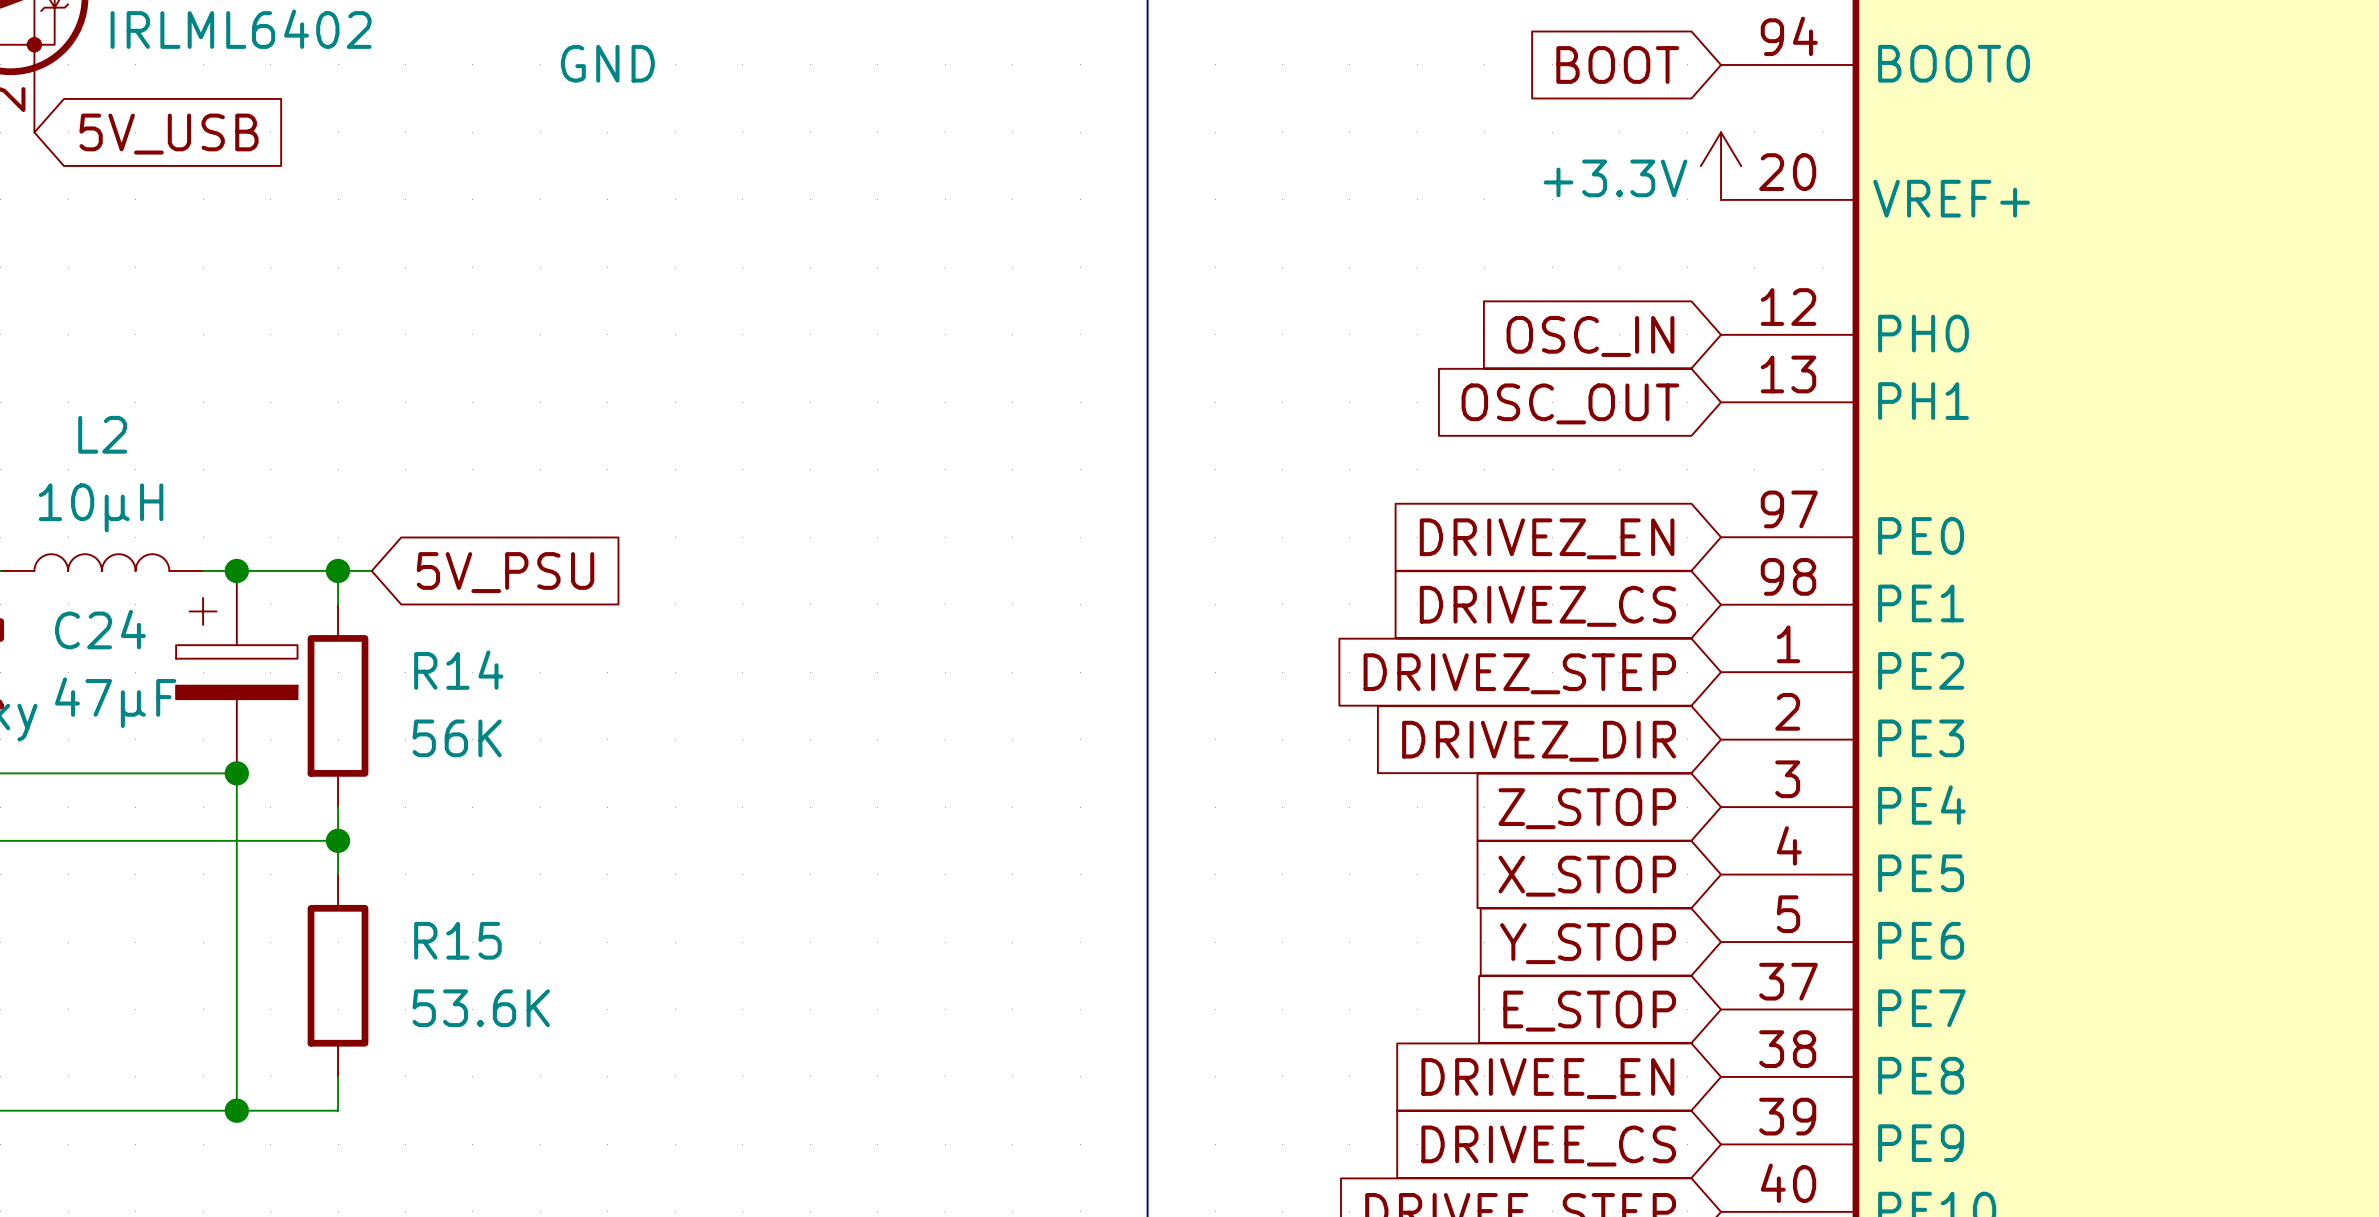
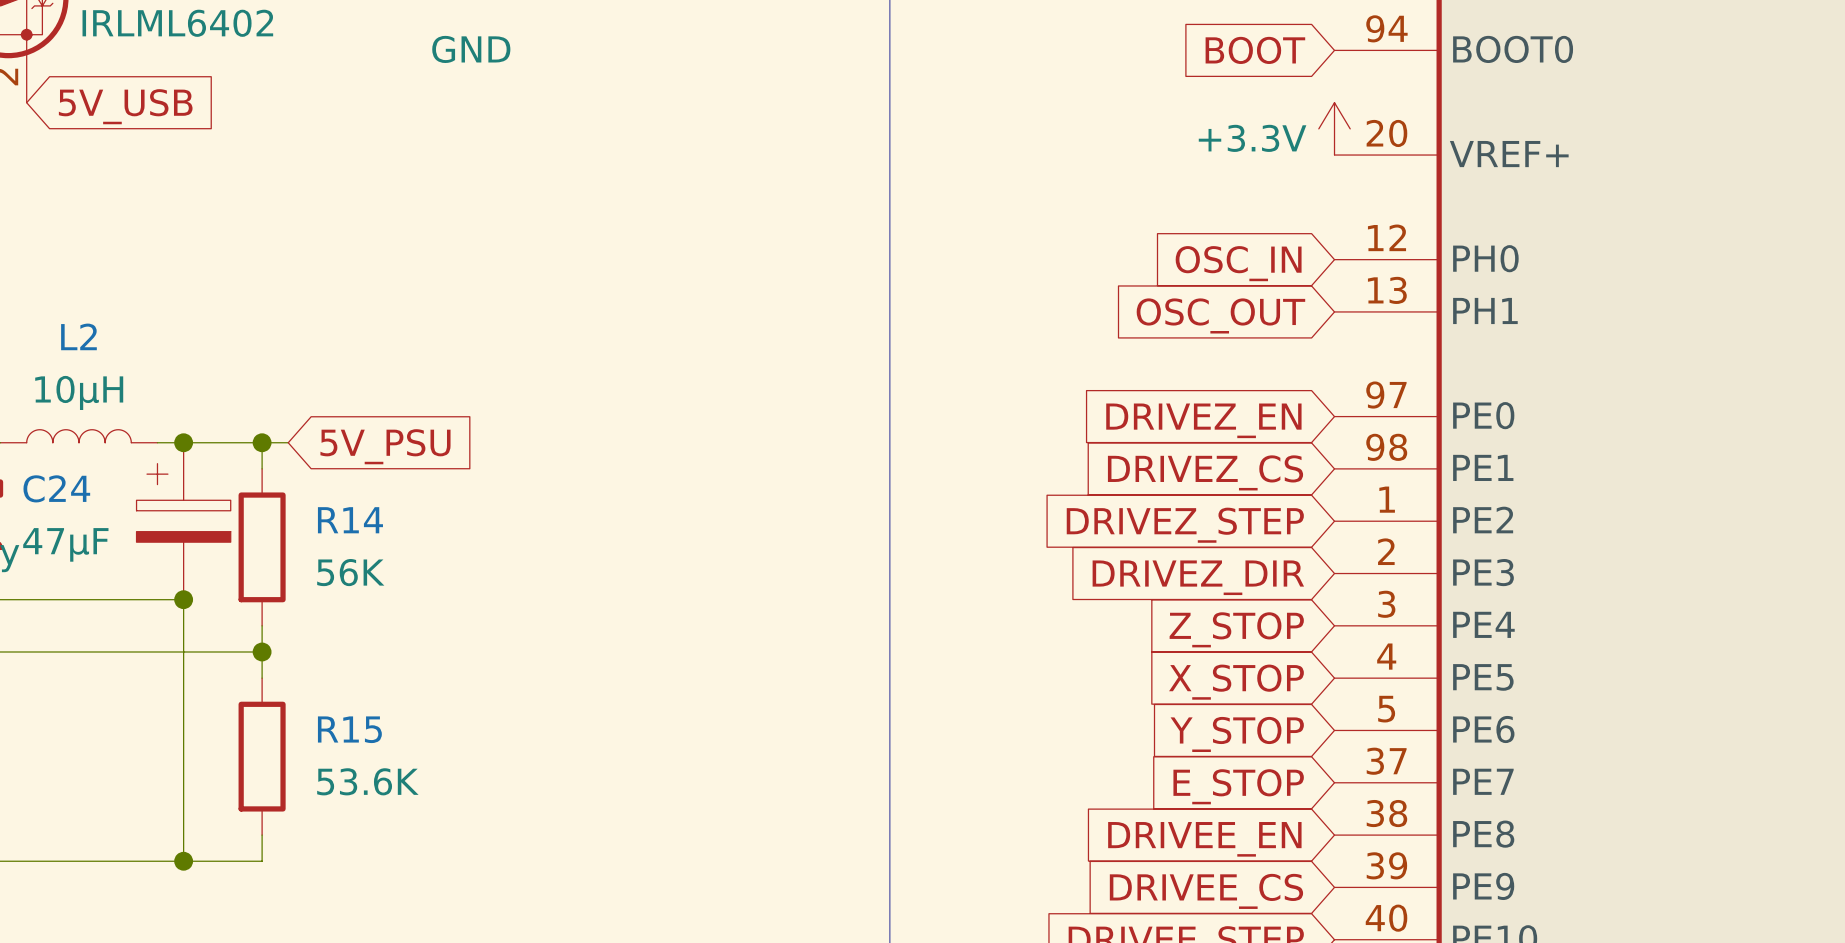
C24 name position: C24 (100, 629) -> C24 (56, 488)
C24 value position: 47µF (115, 702) -> 47µF (65, 544)

